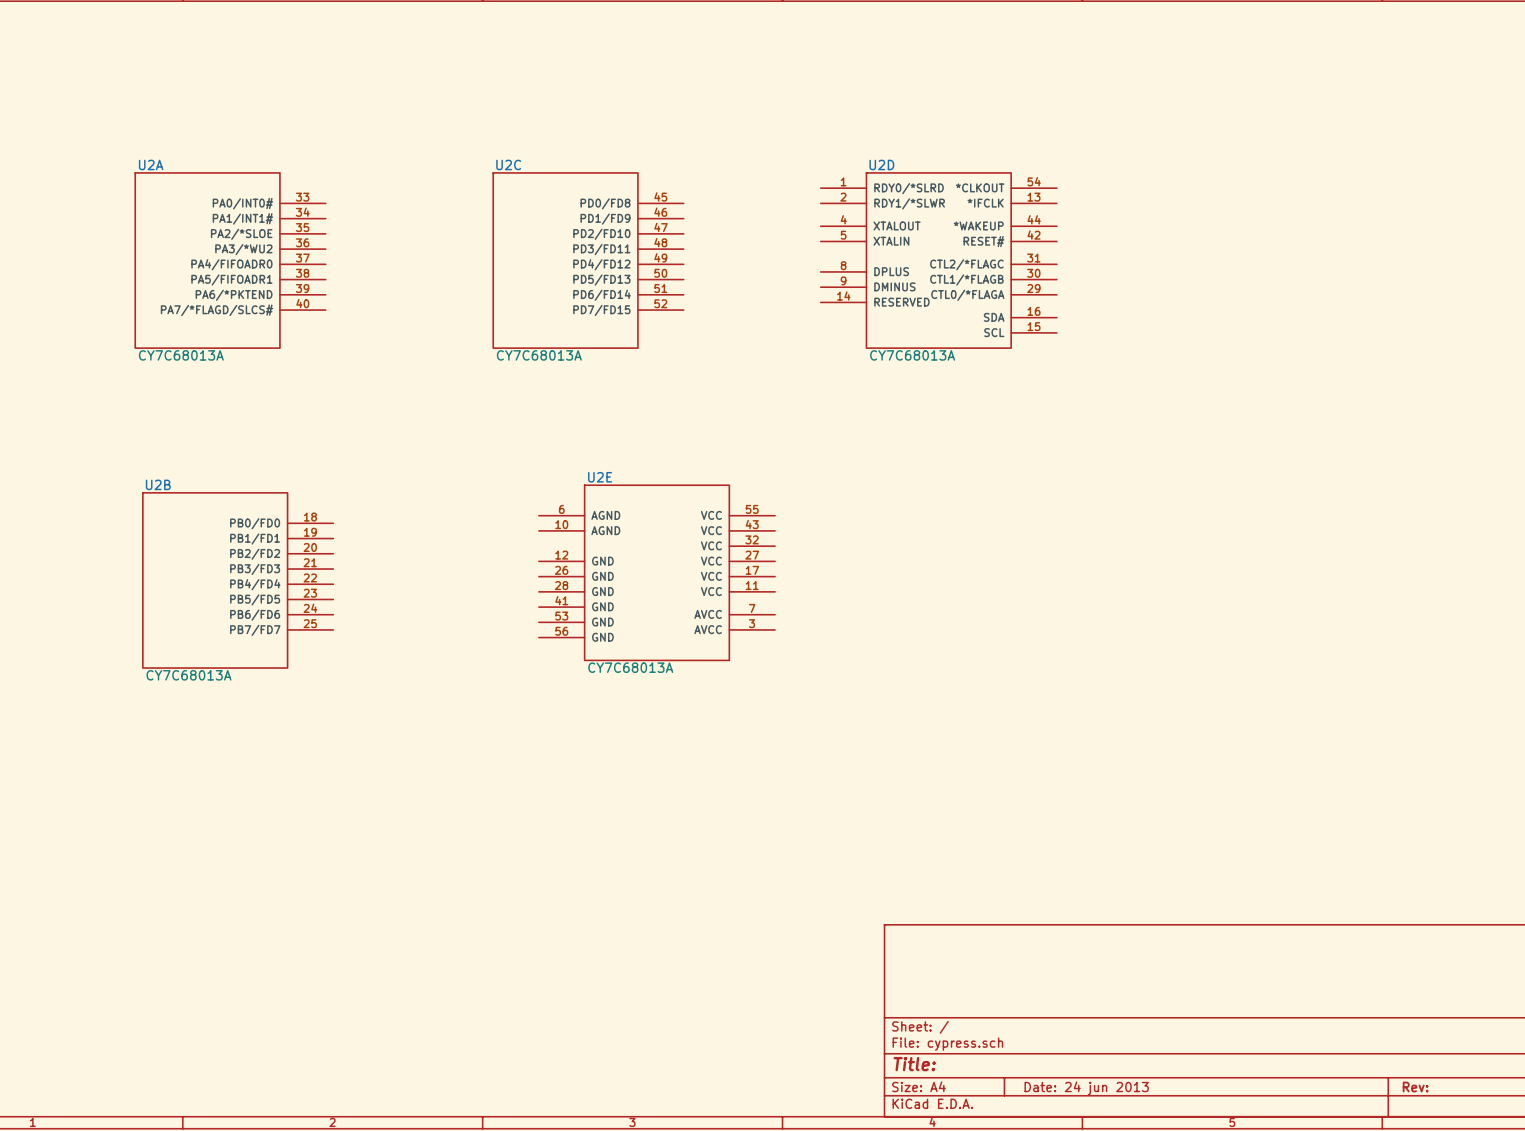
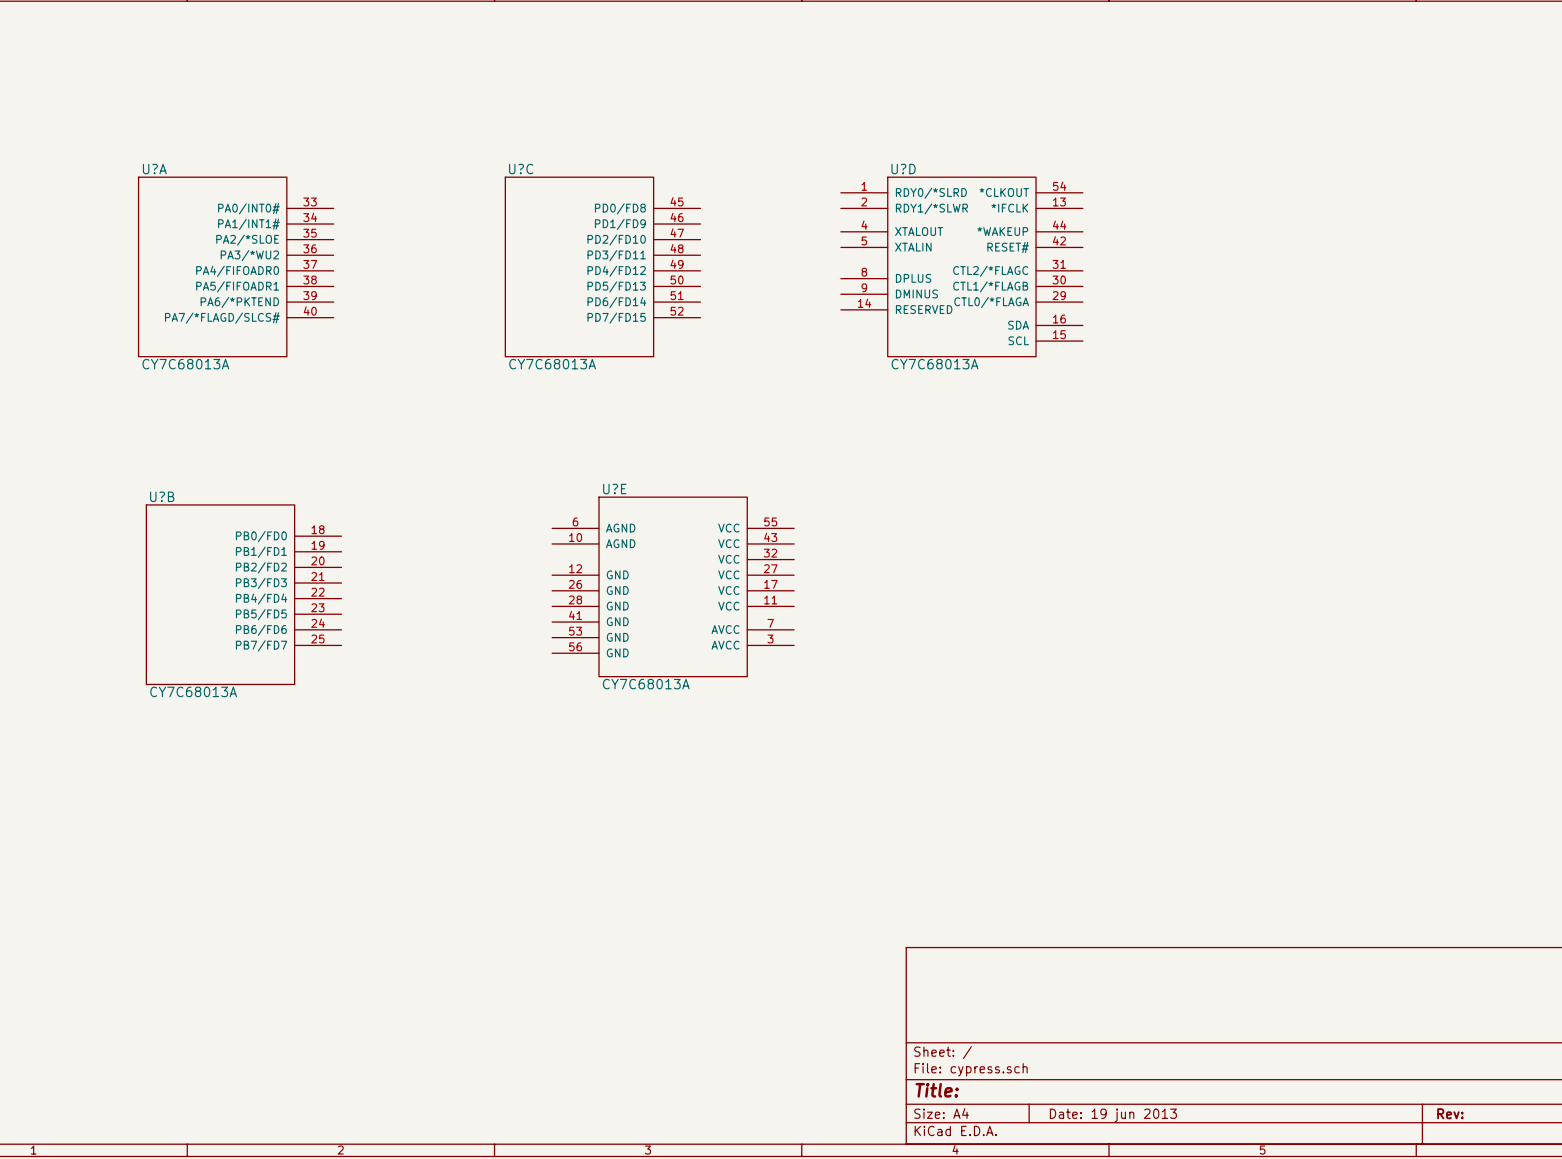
U2A name: U2A (151, 164) -> U?A (154, 169)
U2C name: U2C (508, 164) -> U?C (521, 169)
U2D name: U2D (881, 164) -> U?D (903, 169)
U2E name: U2E (600, 477) -> U?E (614, 489)
U2B name: U2B (158, 484) -> U?B (162, 496)
title block: Date: 24 jun 2013 (1086, 1088) -> Date: 19 jun 2013 (1113, 1115)

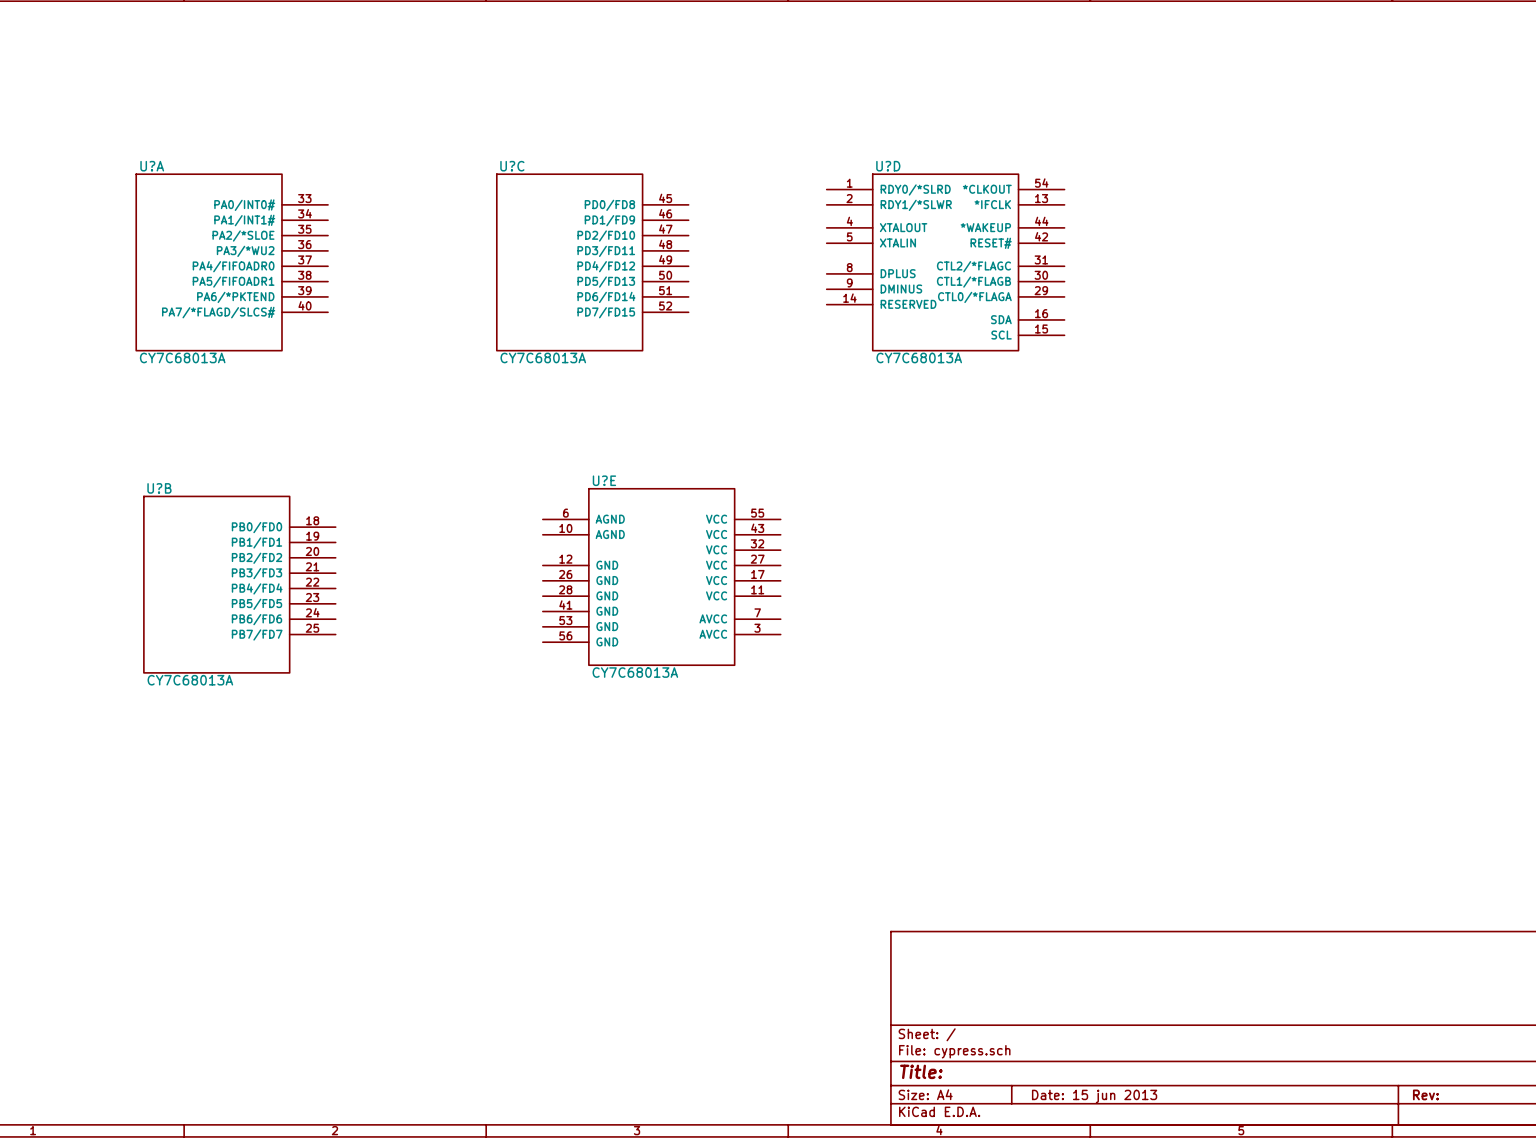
title block: Date: 19 jun 2013 (1113, 1115) -> Date: 15 jun 2013 (1094, 1096)

